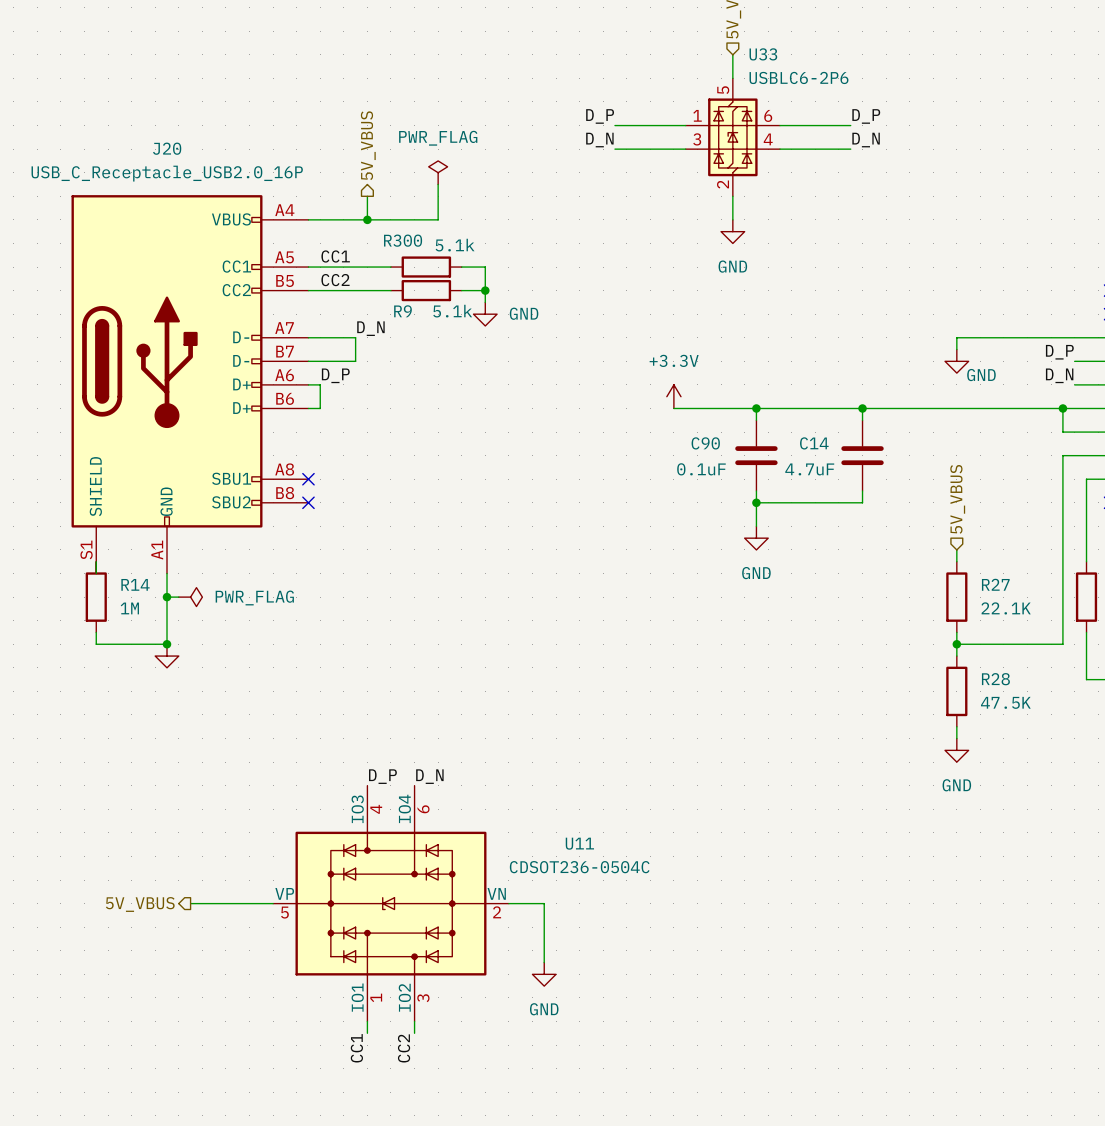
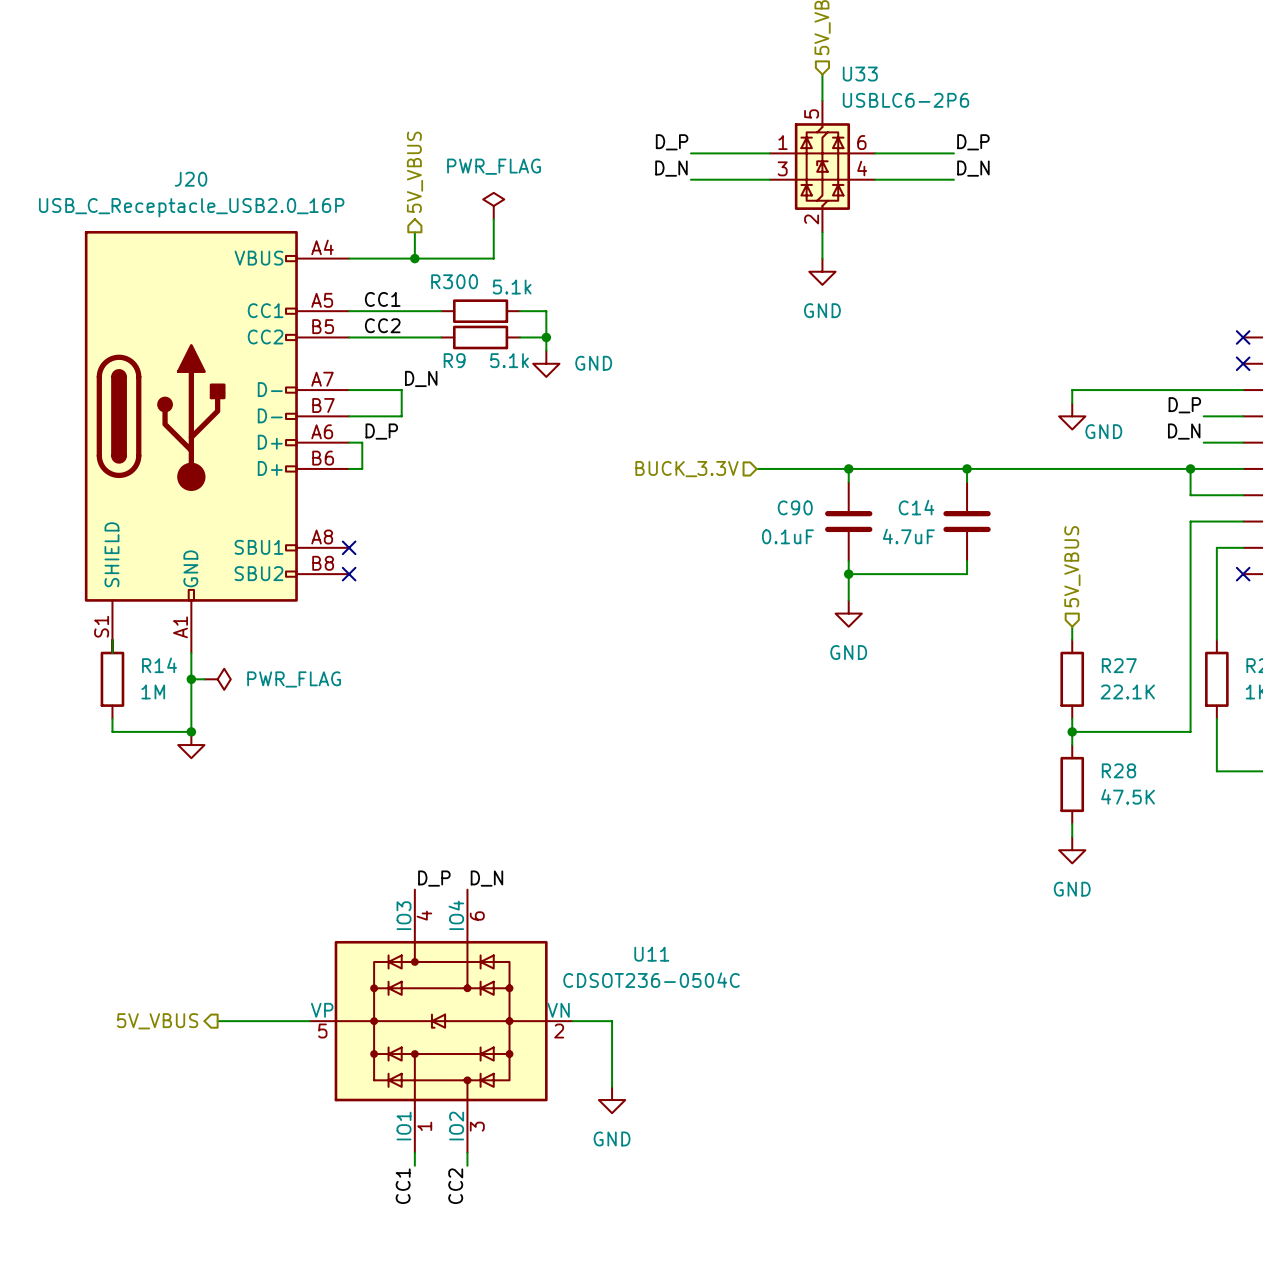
power symbol: +3.3V (673, 396) -> none
hierarchical label: none -> BUCK_3.3V (686, 469)

